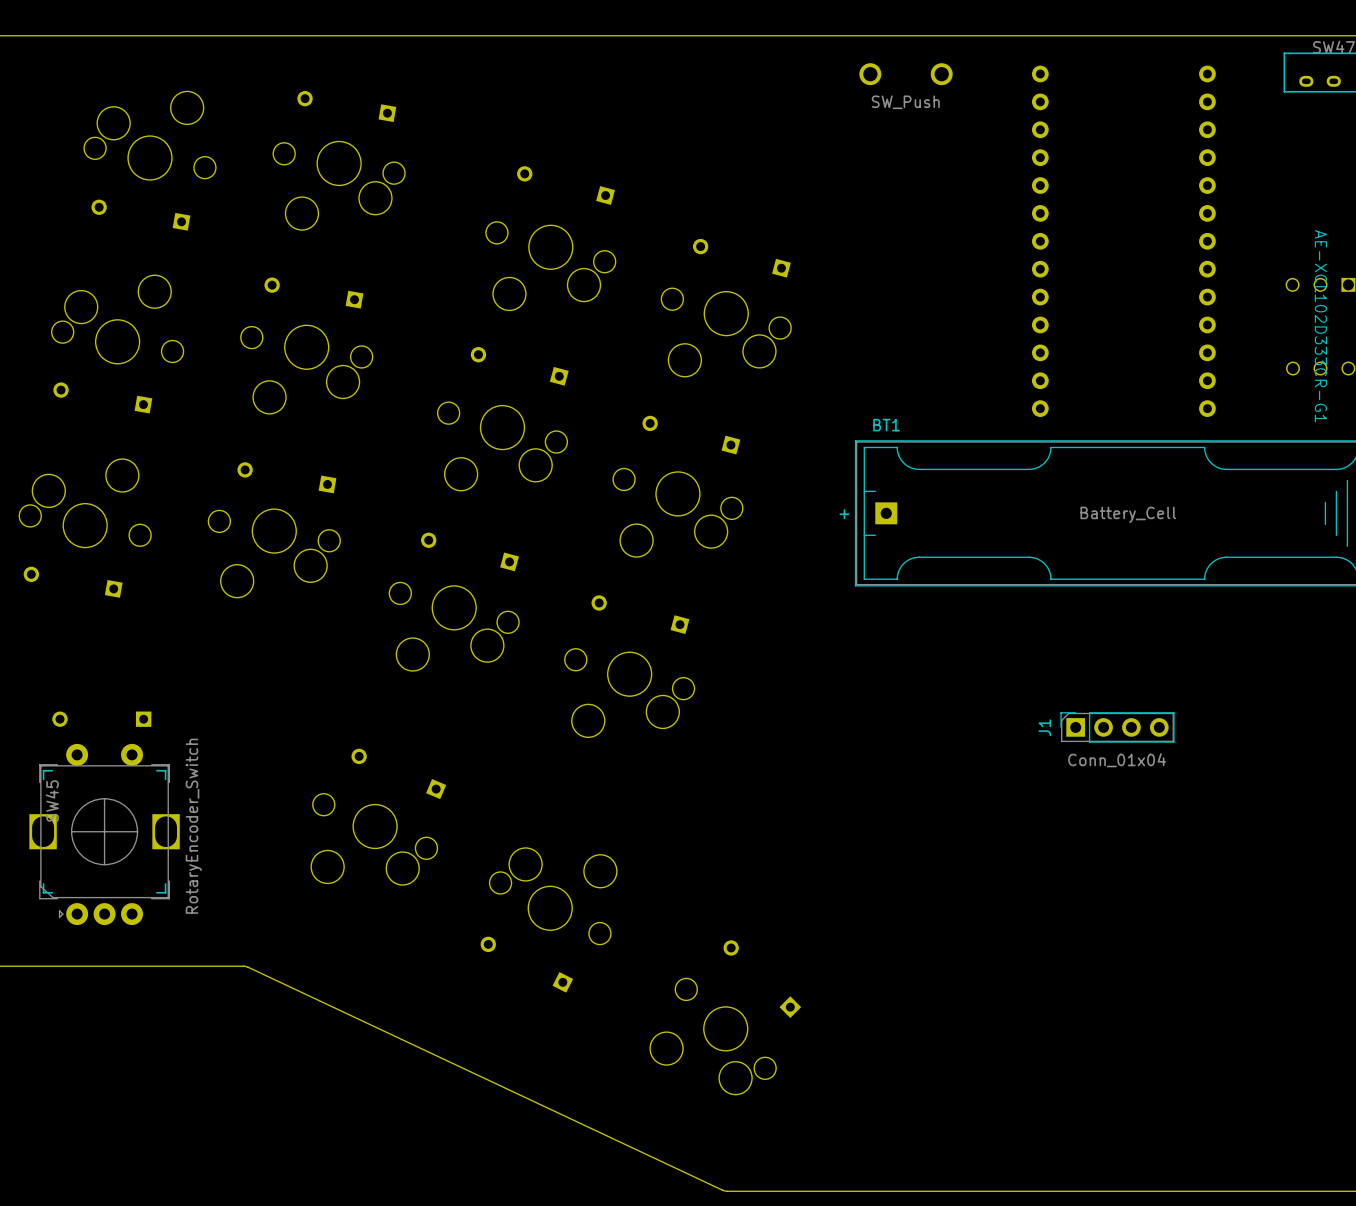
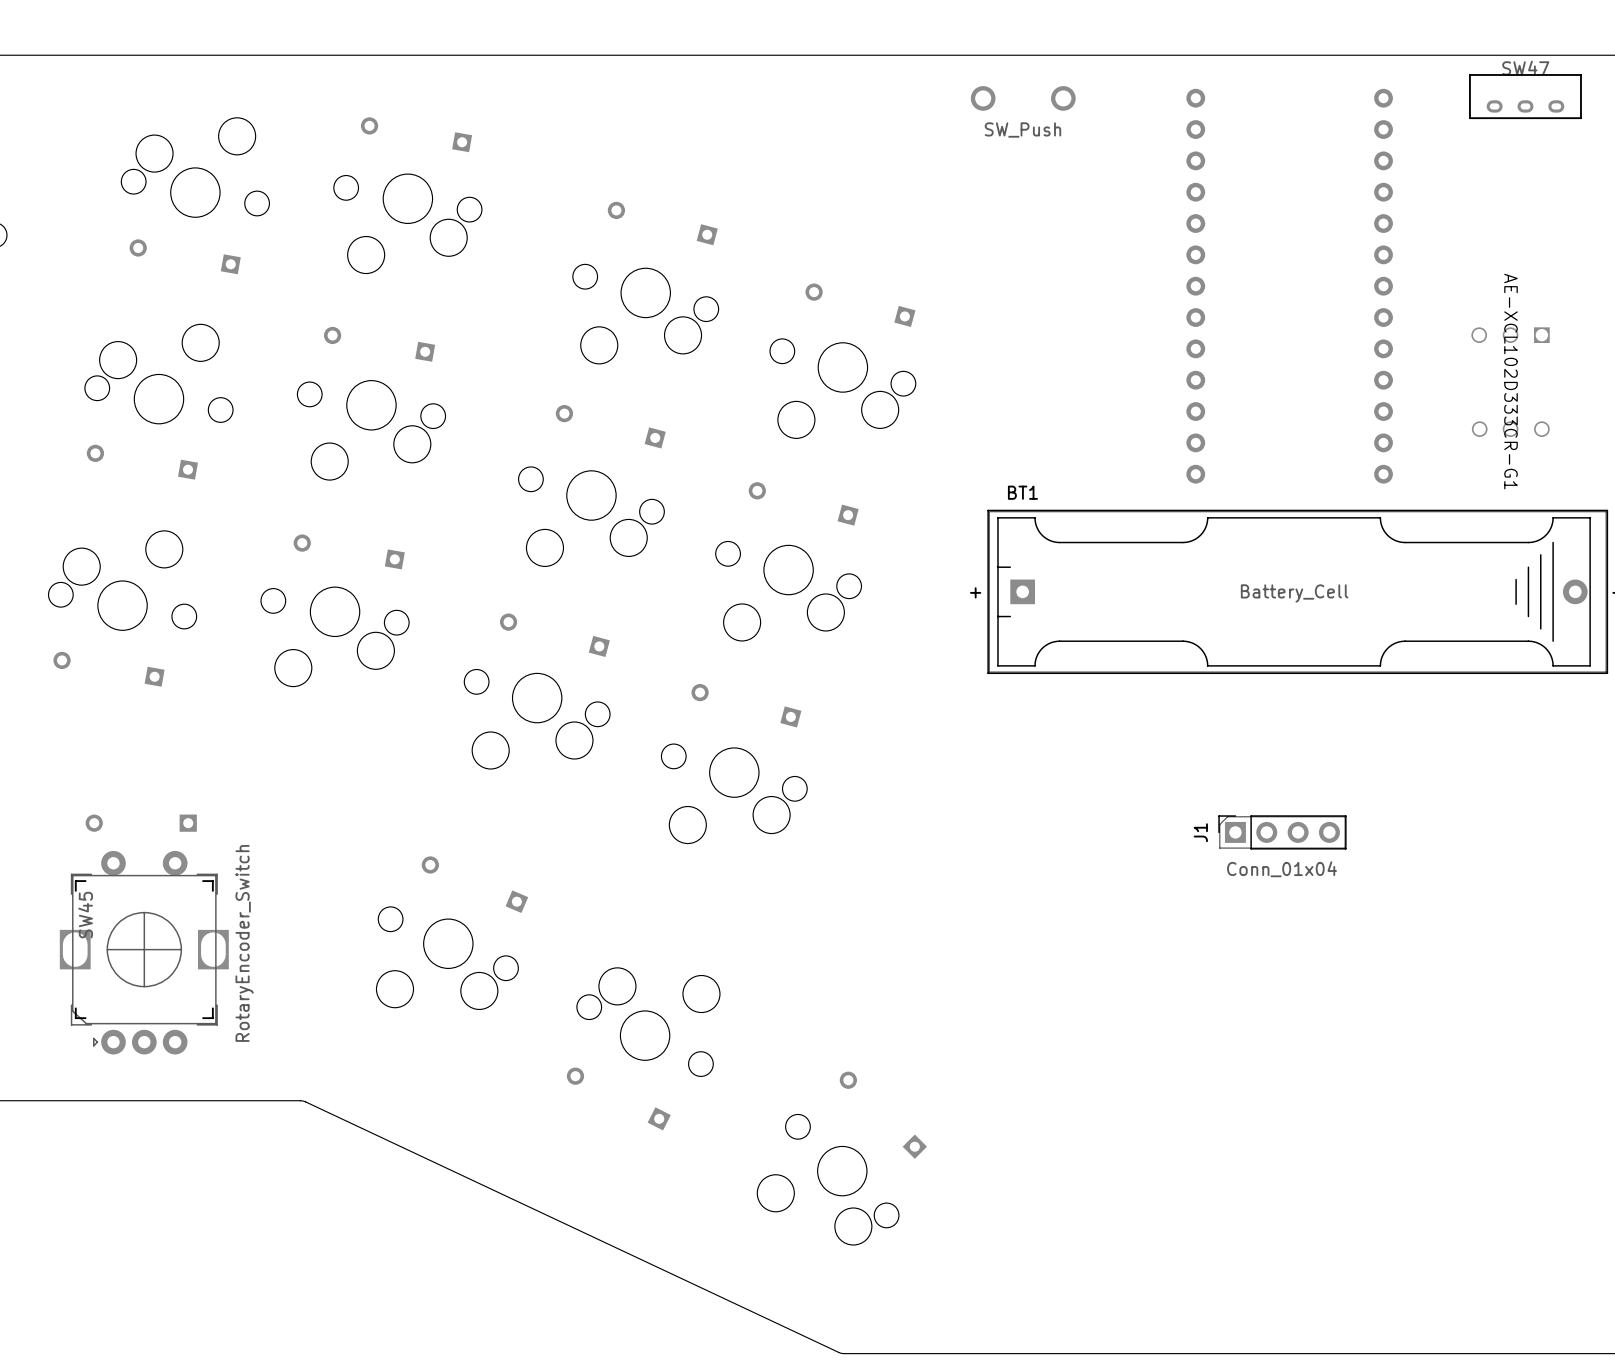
part position: (906, 74) -> (1023, 98)

